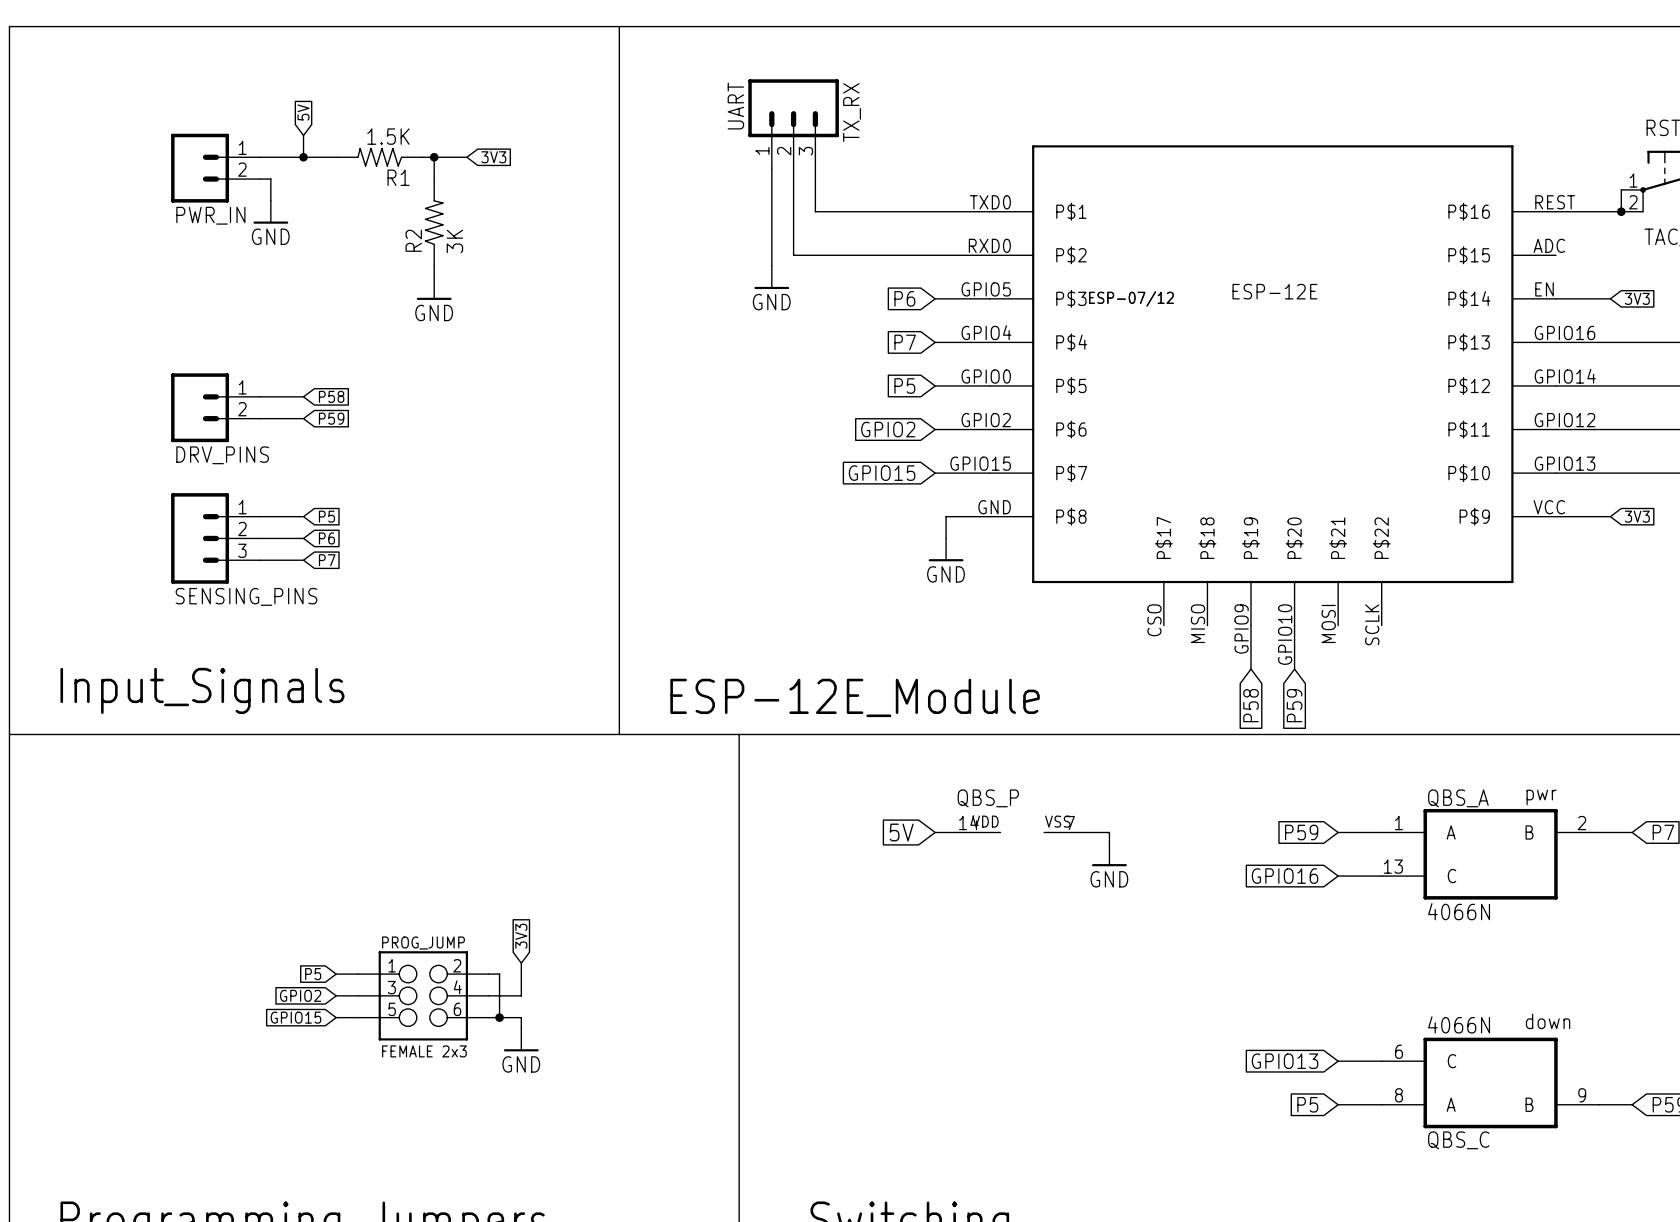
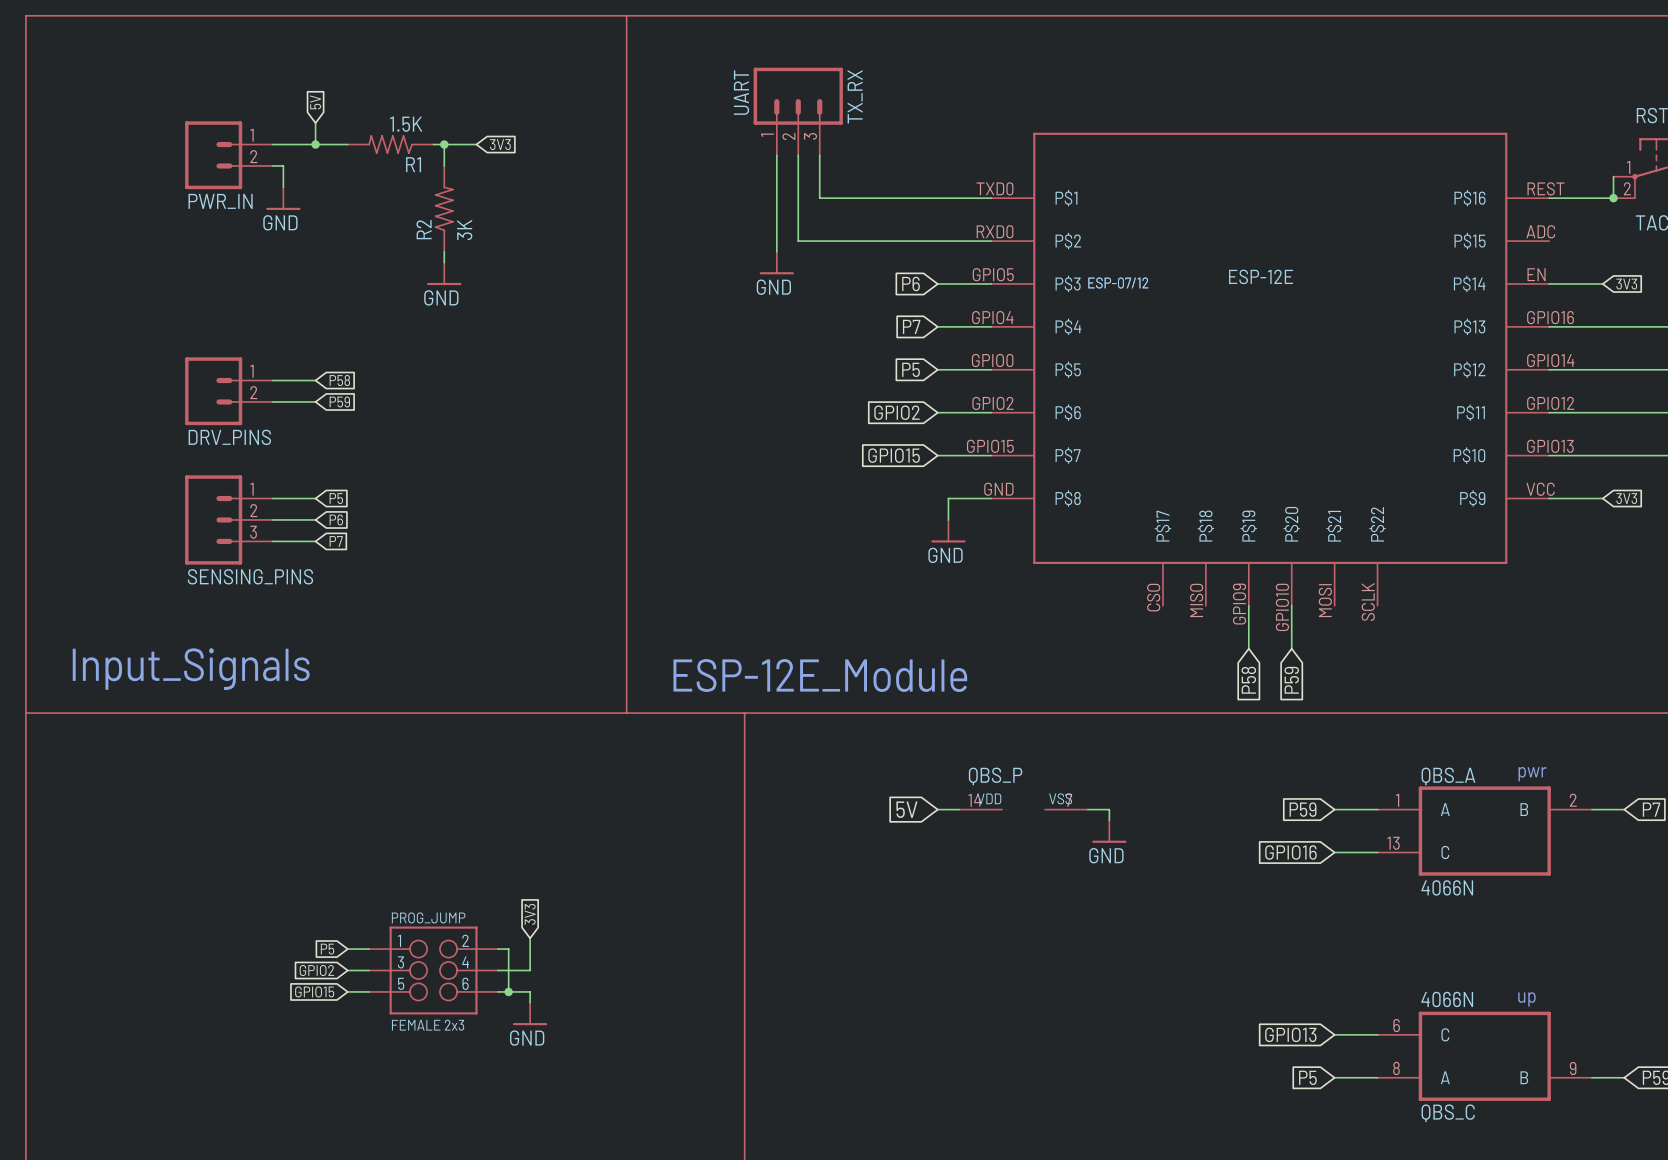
text: down (1548, 1021) -> up (1526, 999)

